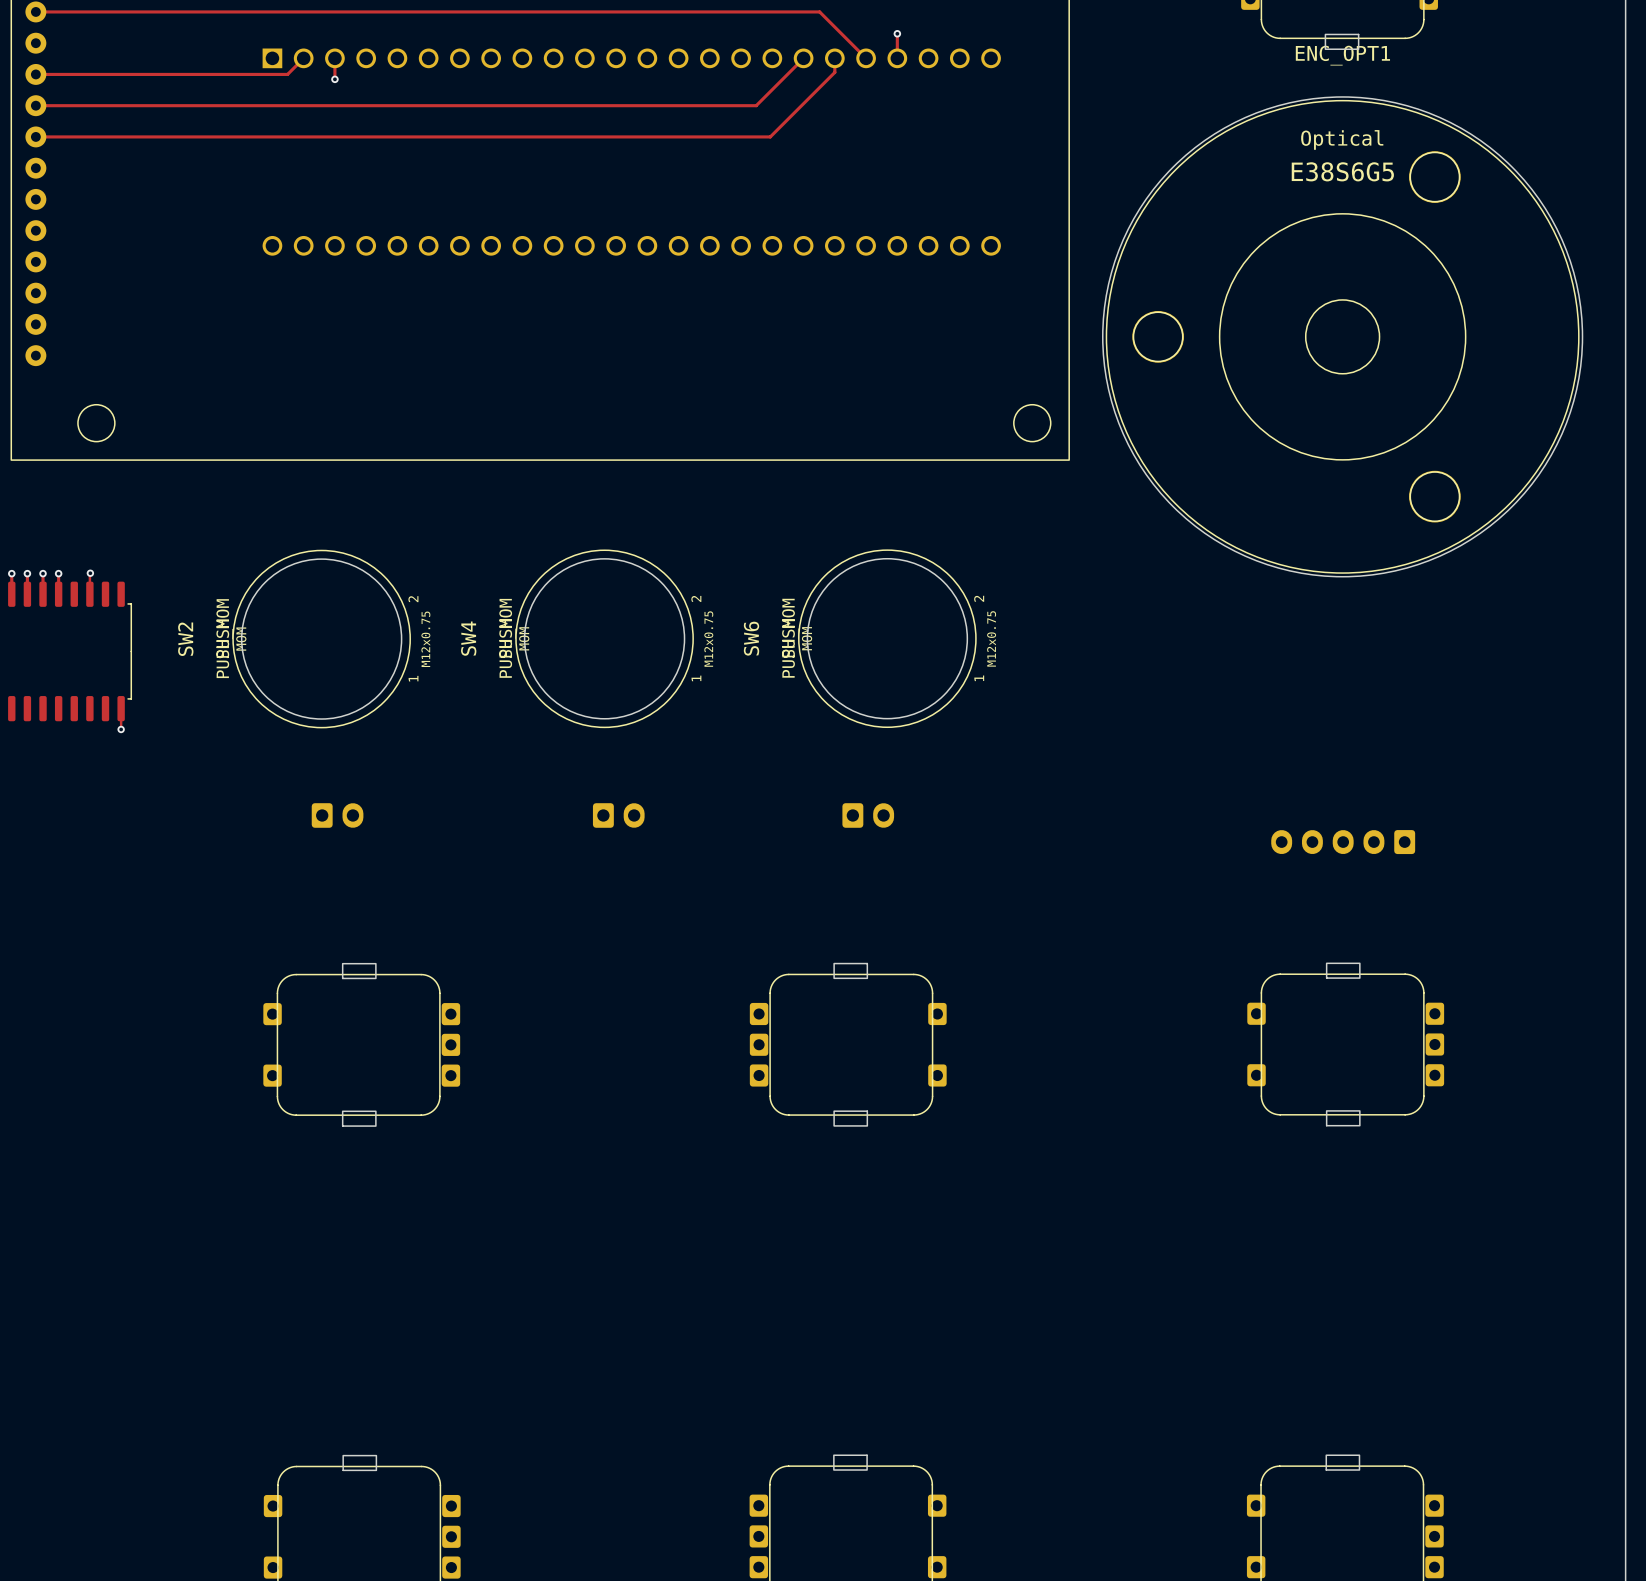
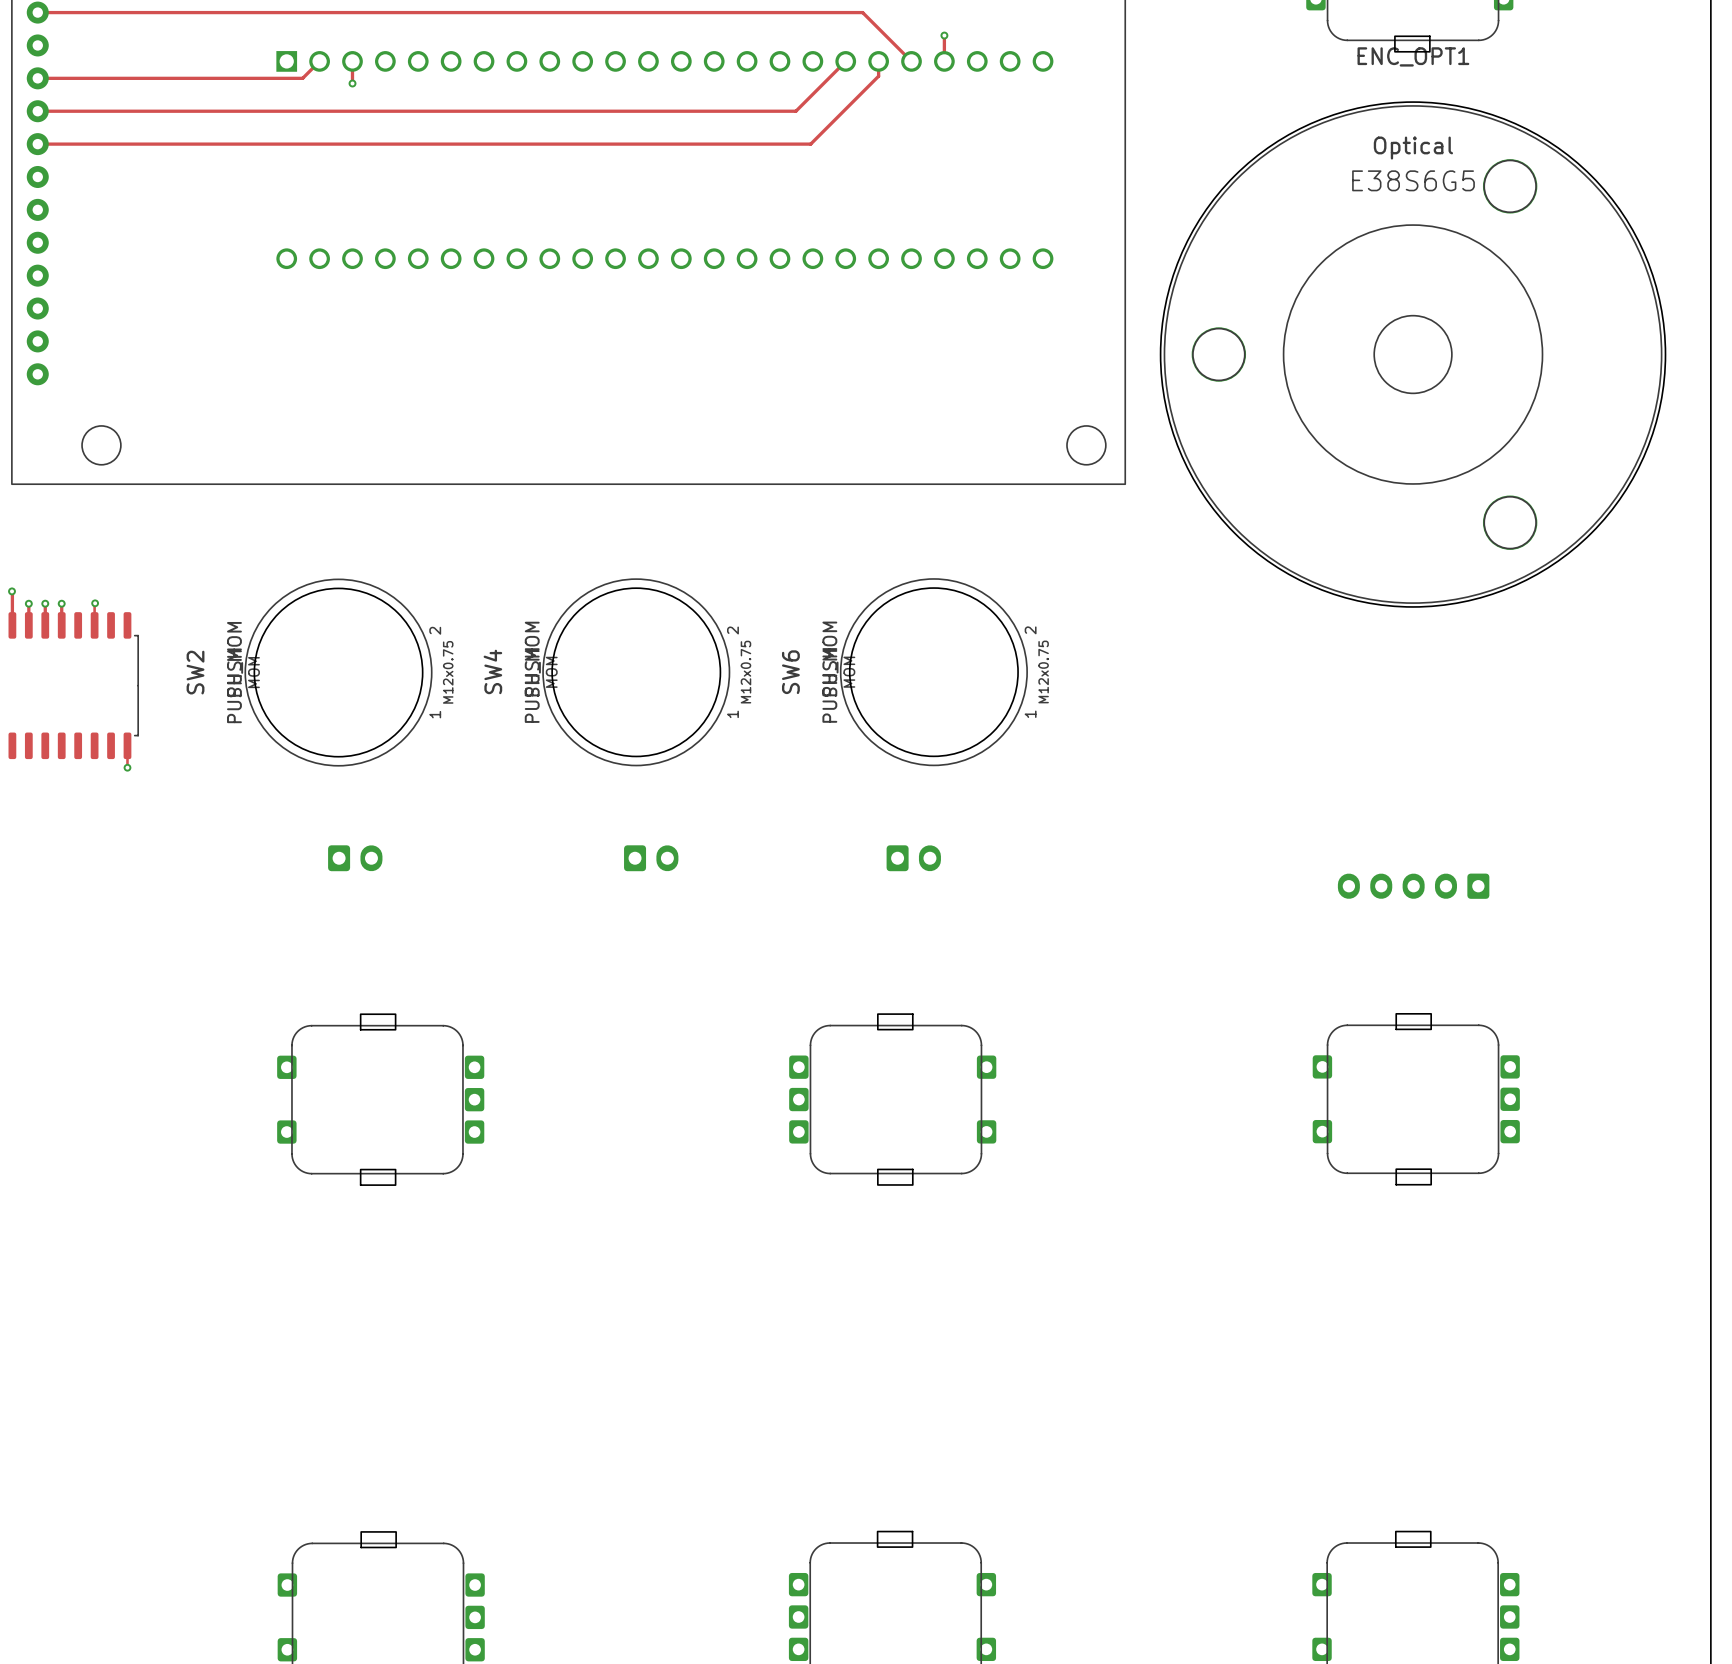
track: none -> (12, 591) (12, 603)
via: none -> (12, 591)
via: (11, 573) -> none

